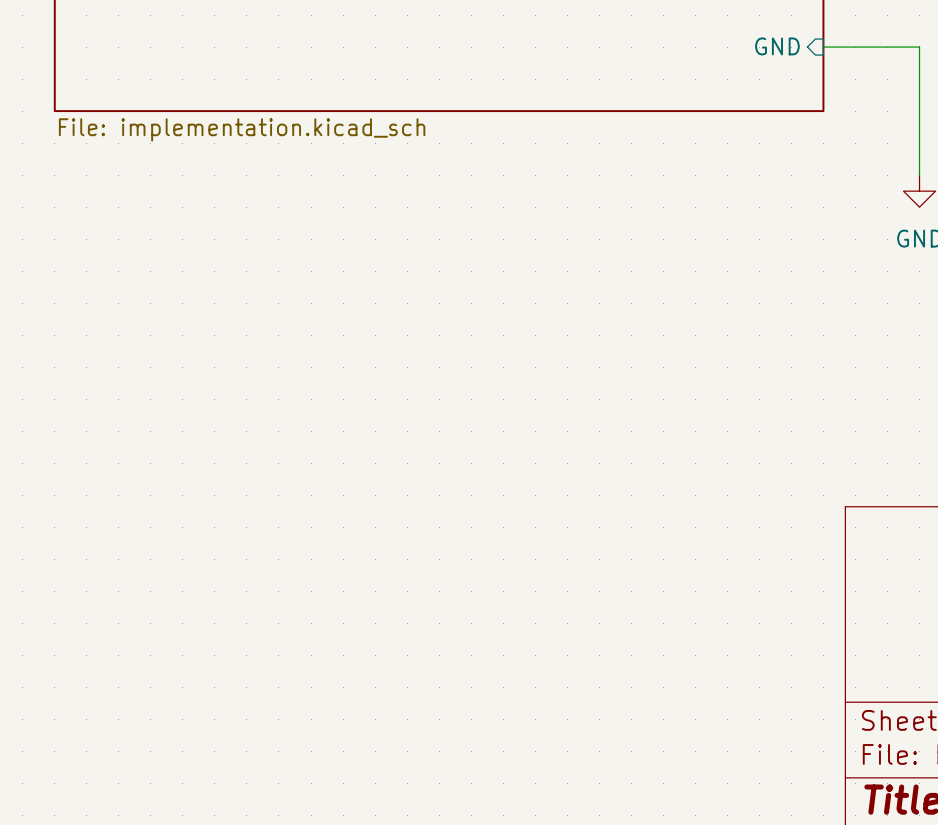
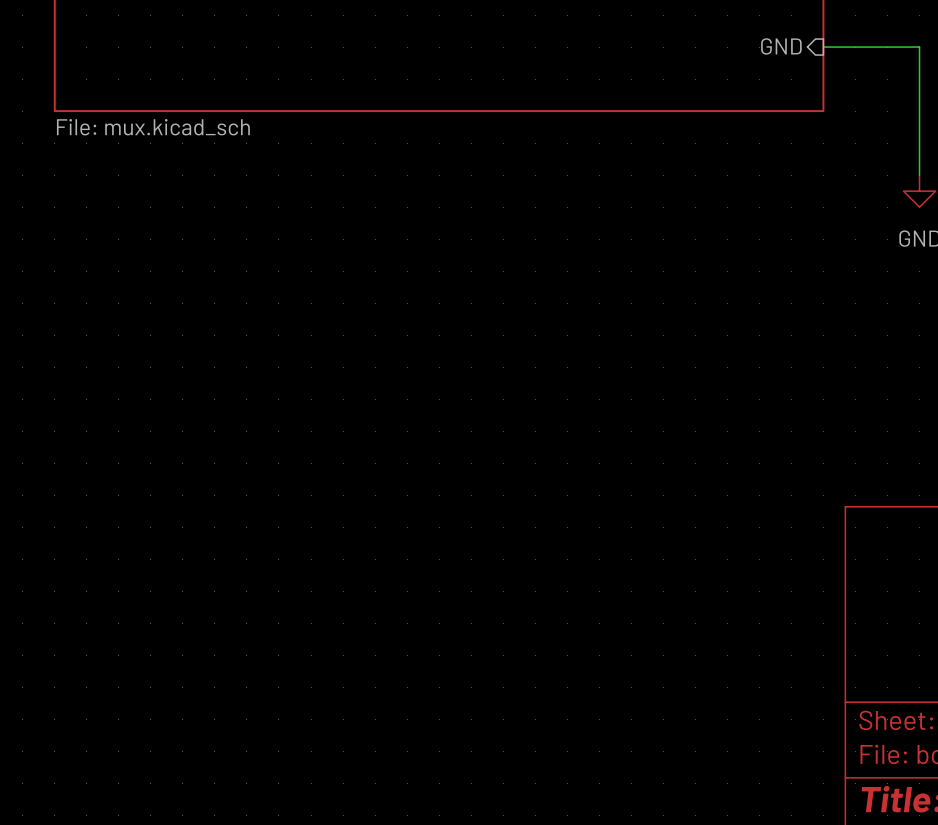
sheet value: File: implementation.kicad_sch (242, 129) -> File: mux.kicad_sch (153, 127)

